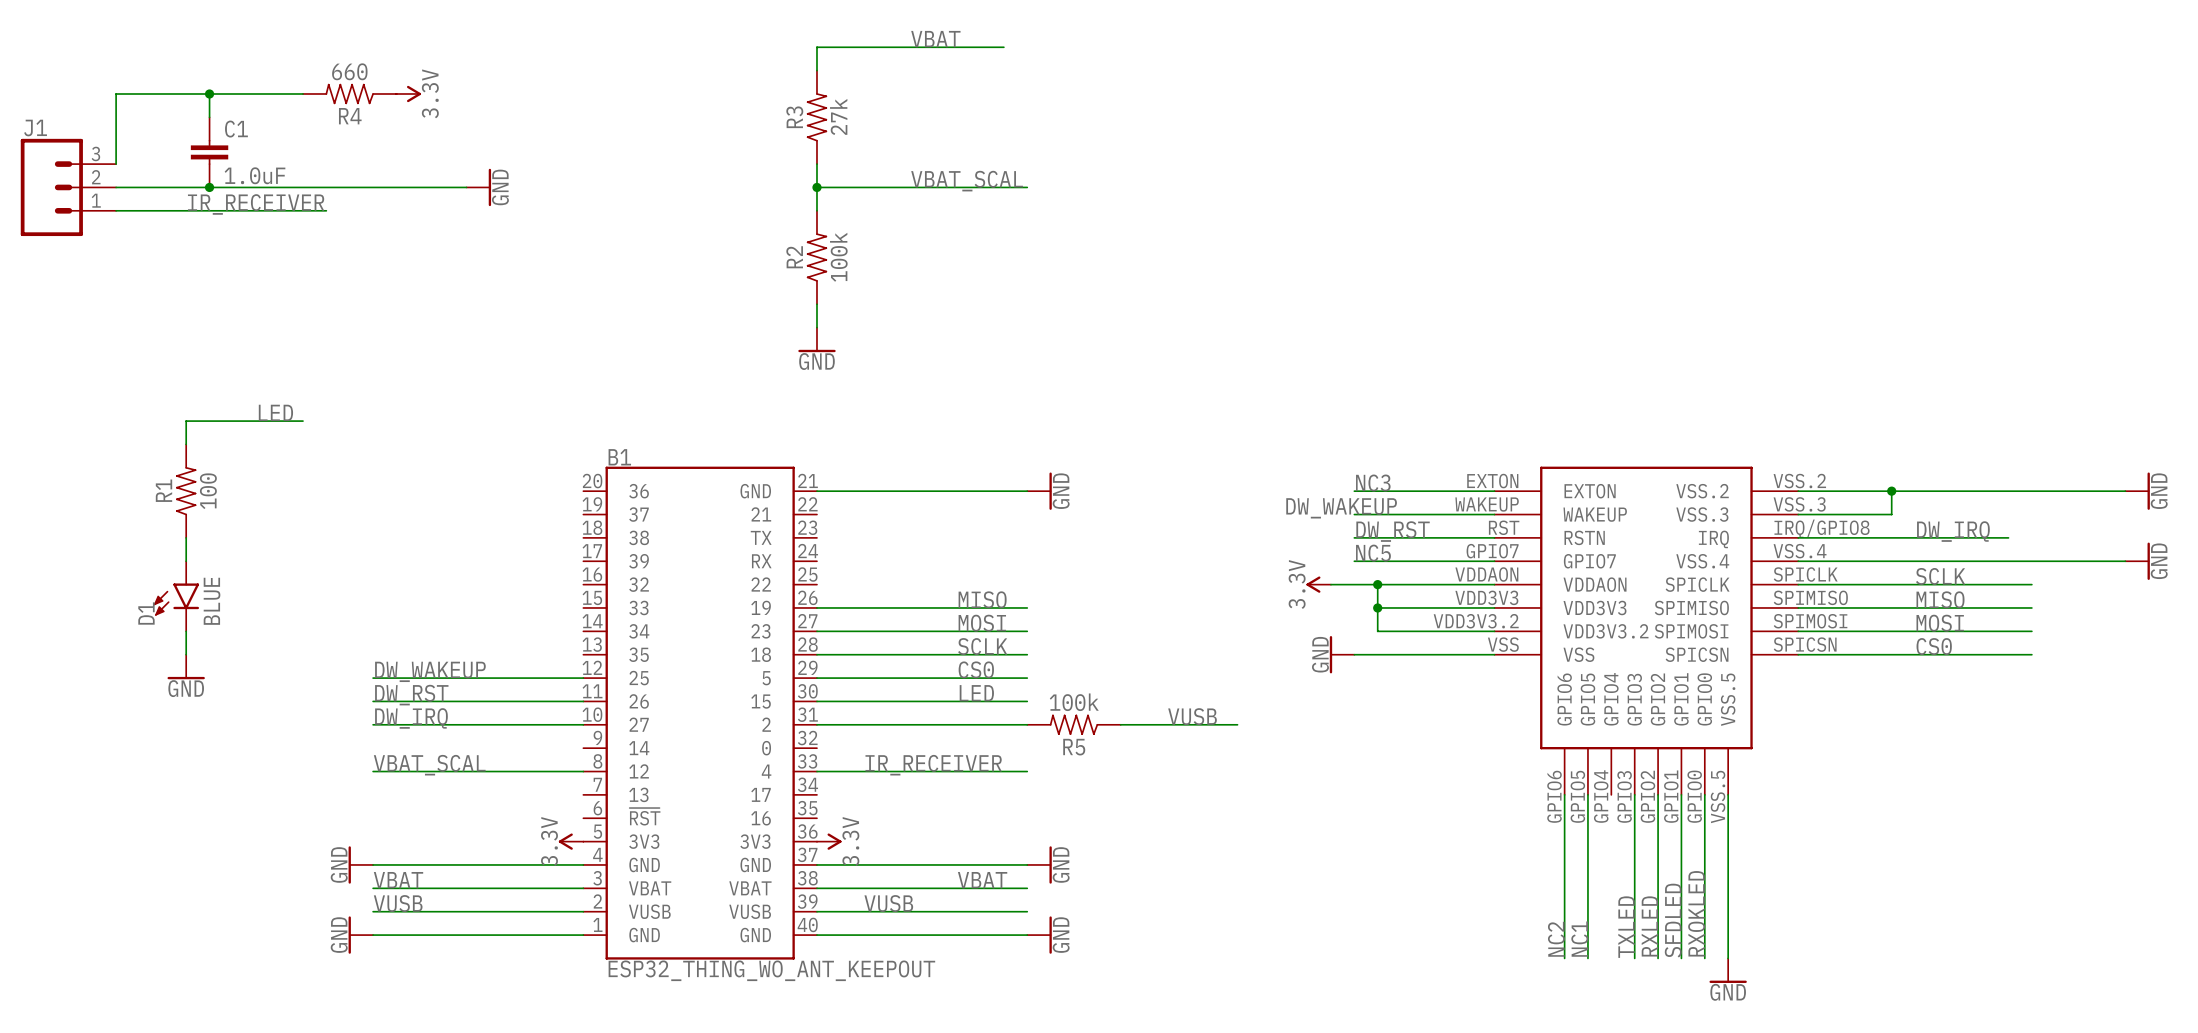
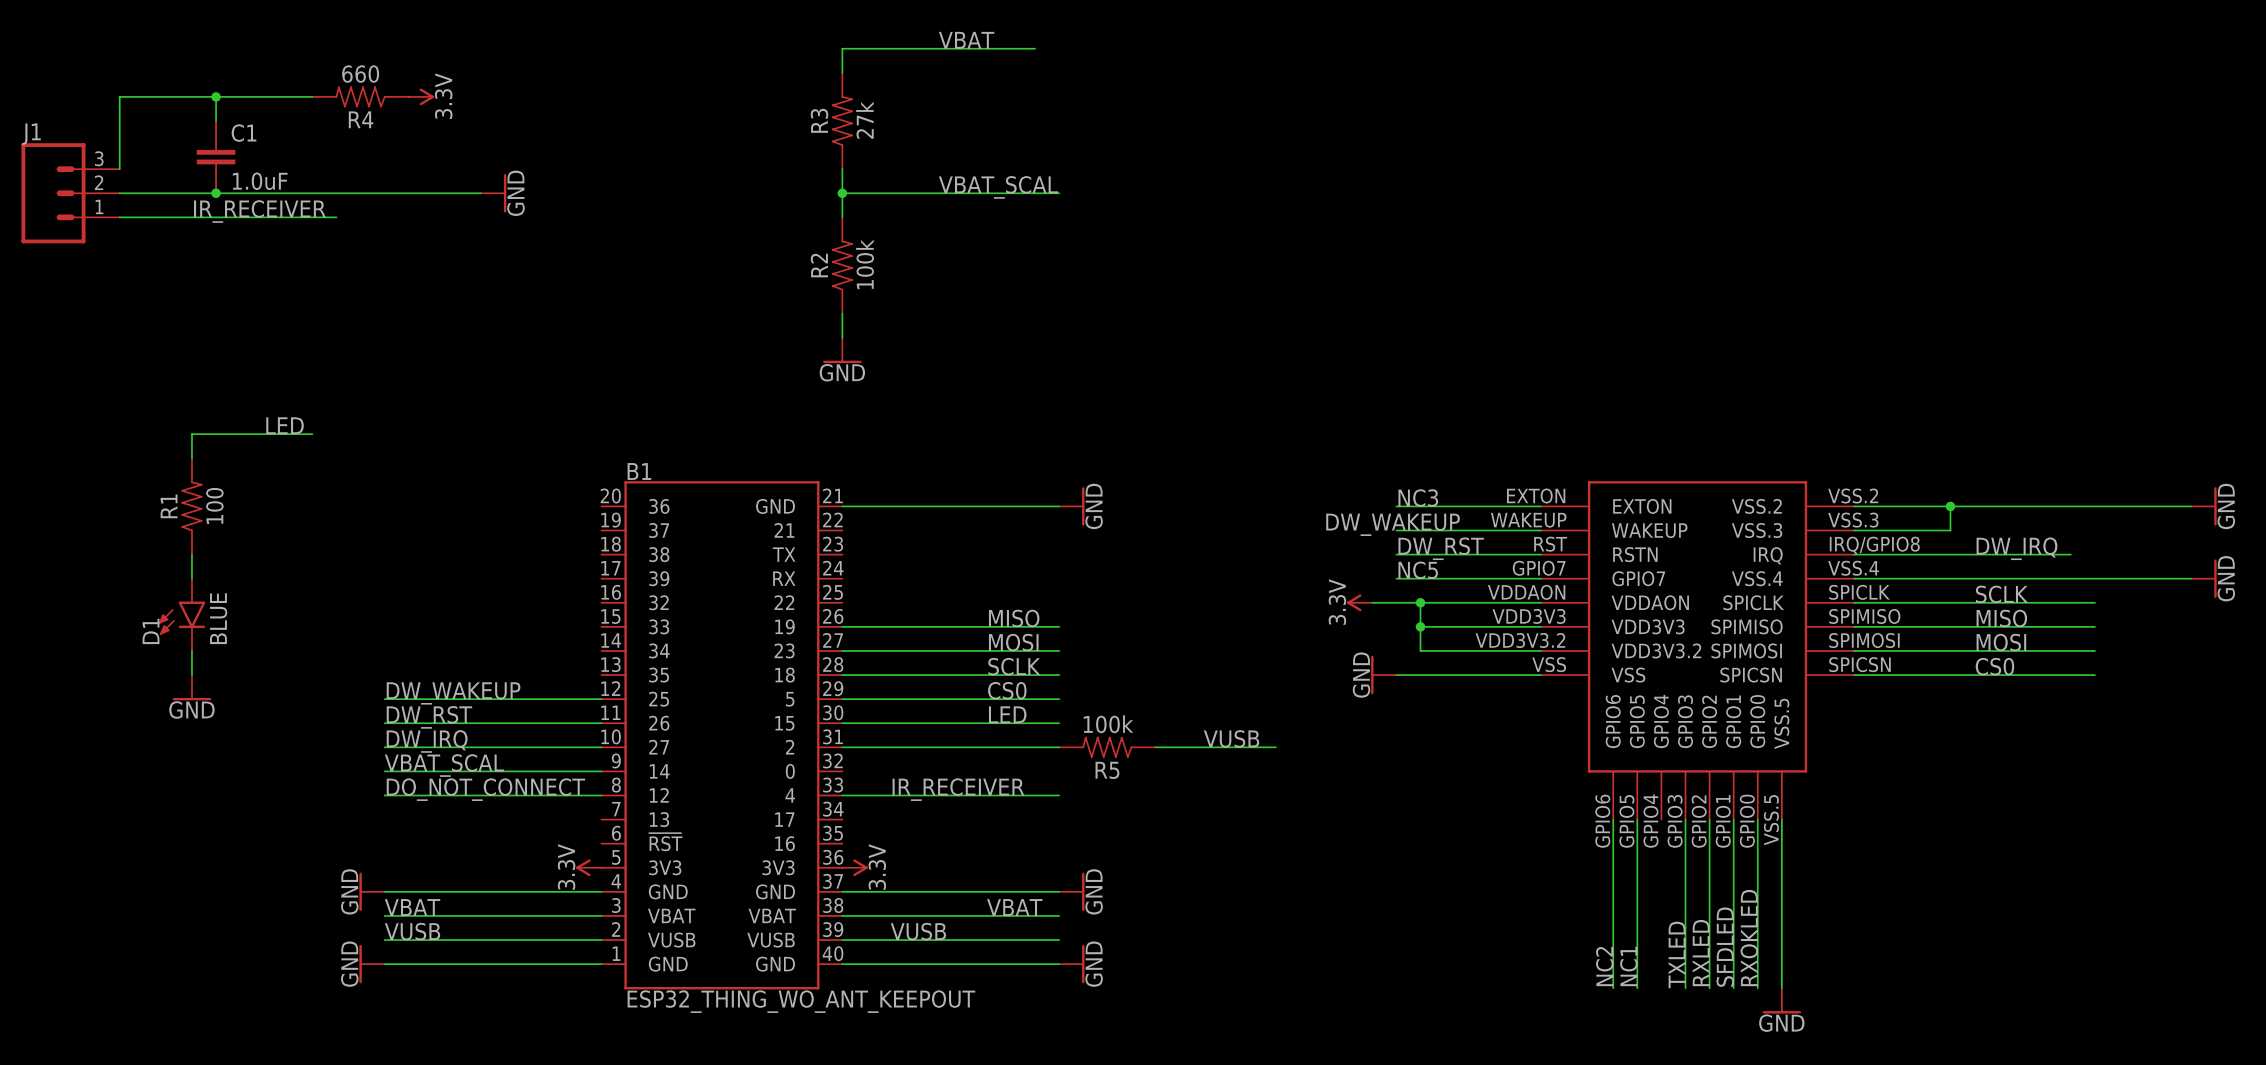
label: none -> VBAT_SCAL (444, 765)
wire: none -> (384, 771) (601, 771)
label: VBAT_SCAL (429, 765) -> DO_NOT_CONNECT (485, 789)

